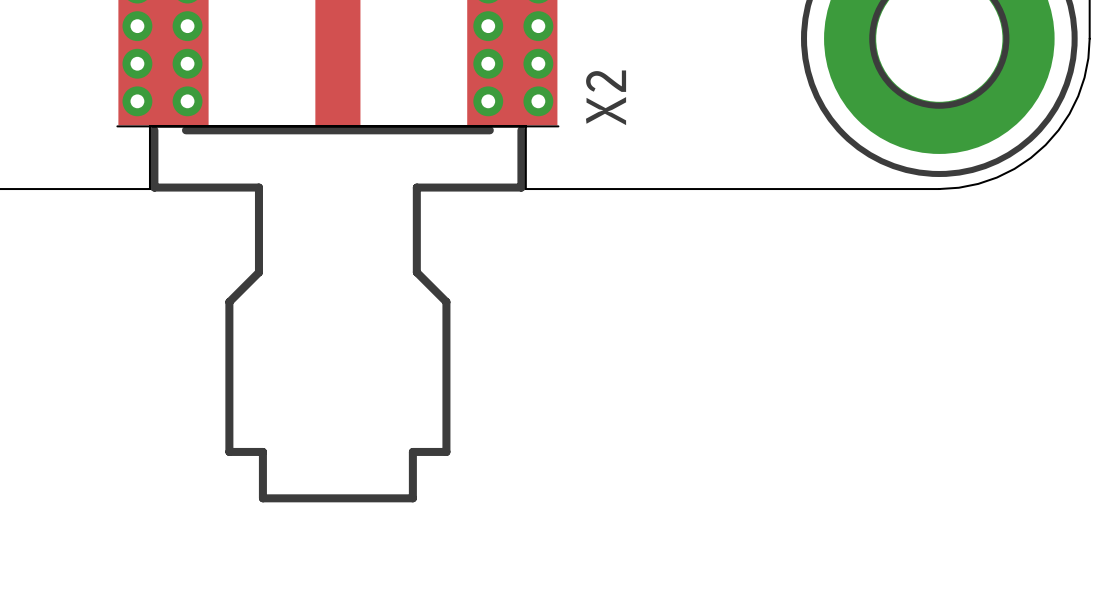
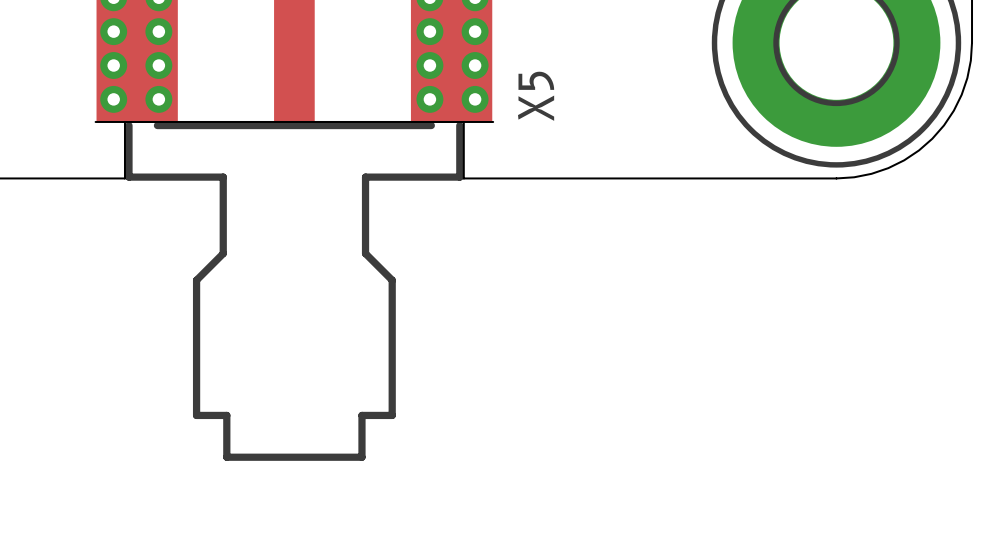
X2 name: X2 (606, 97) -> X5 (536, 96)

